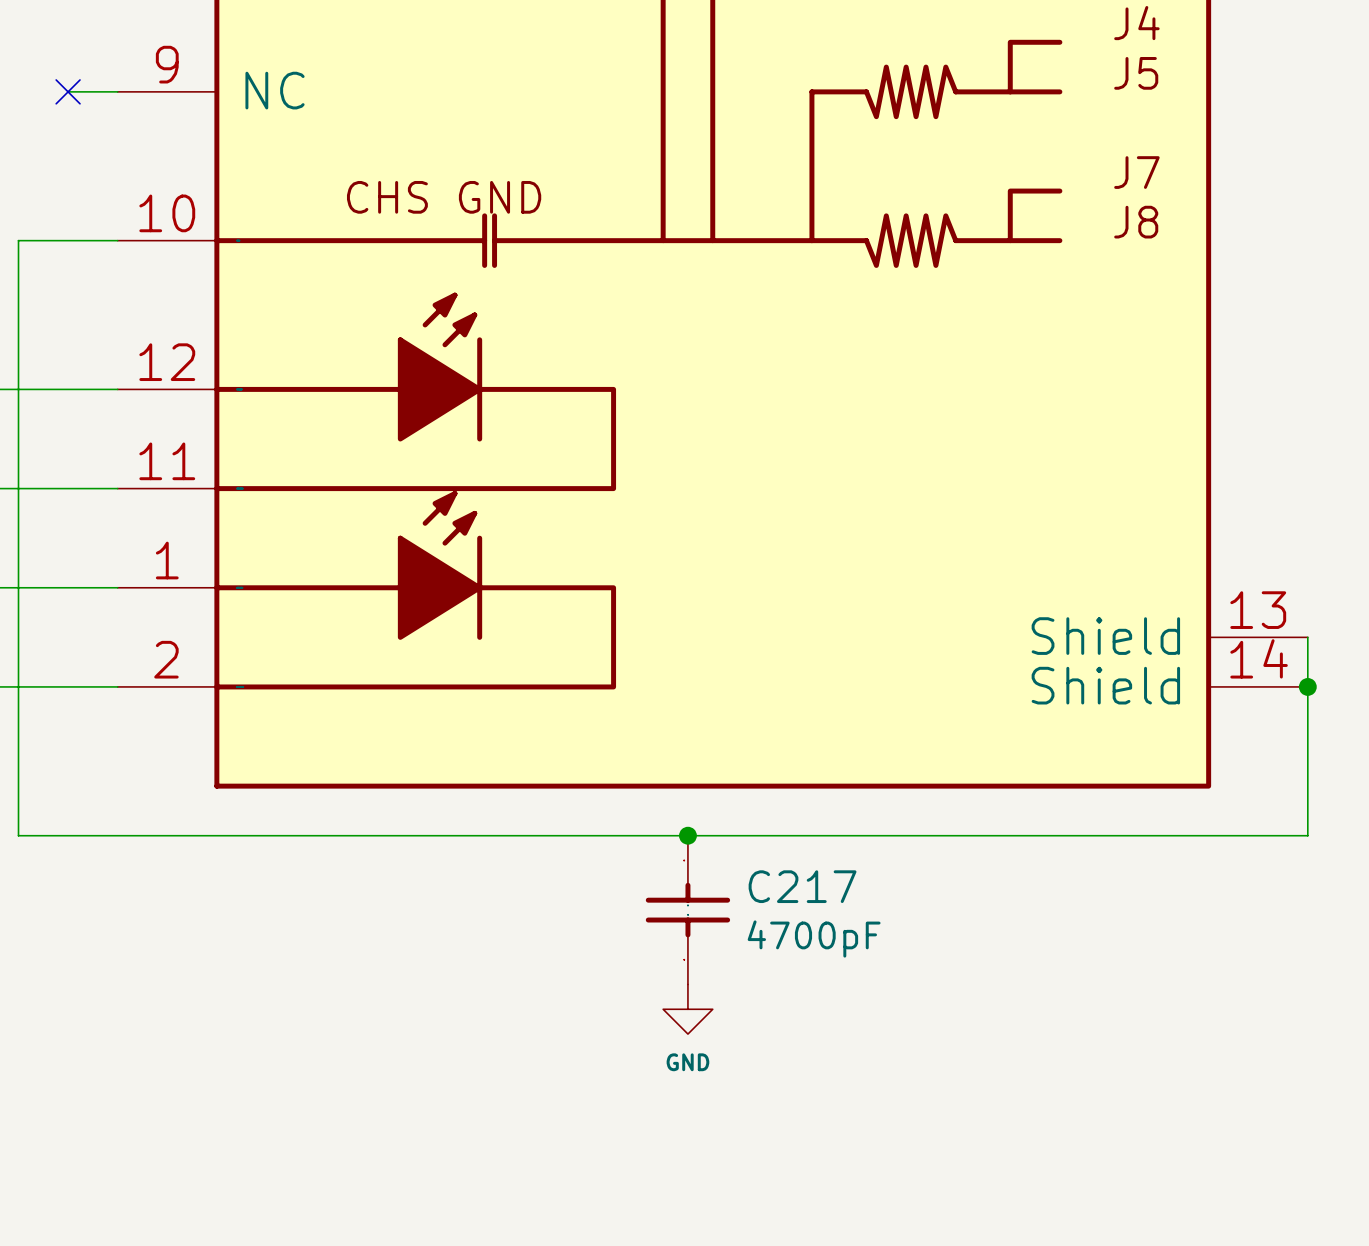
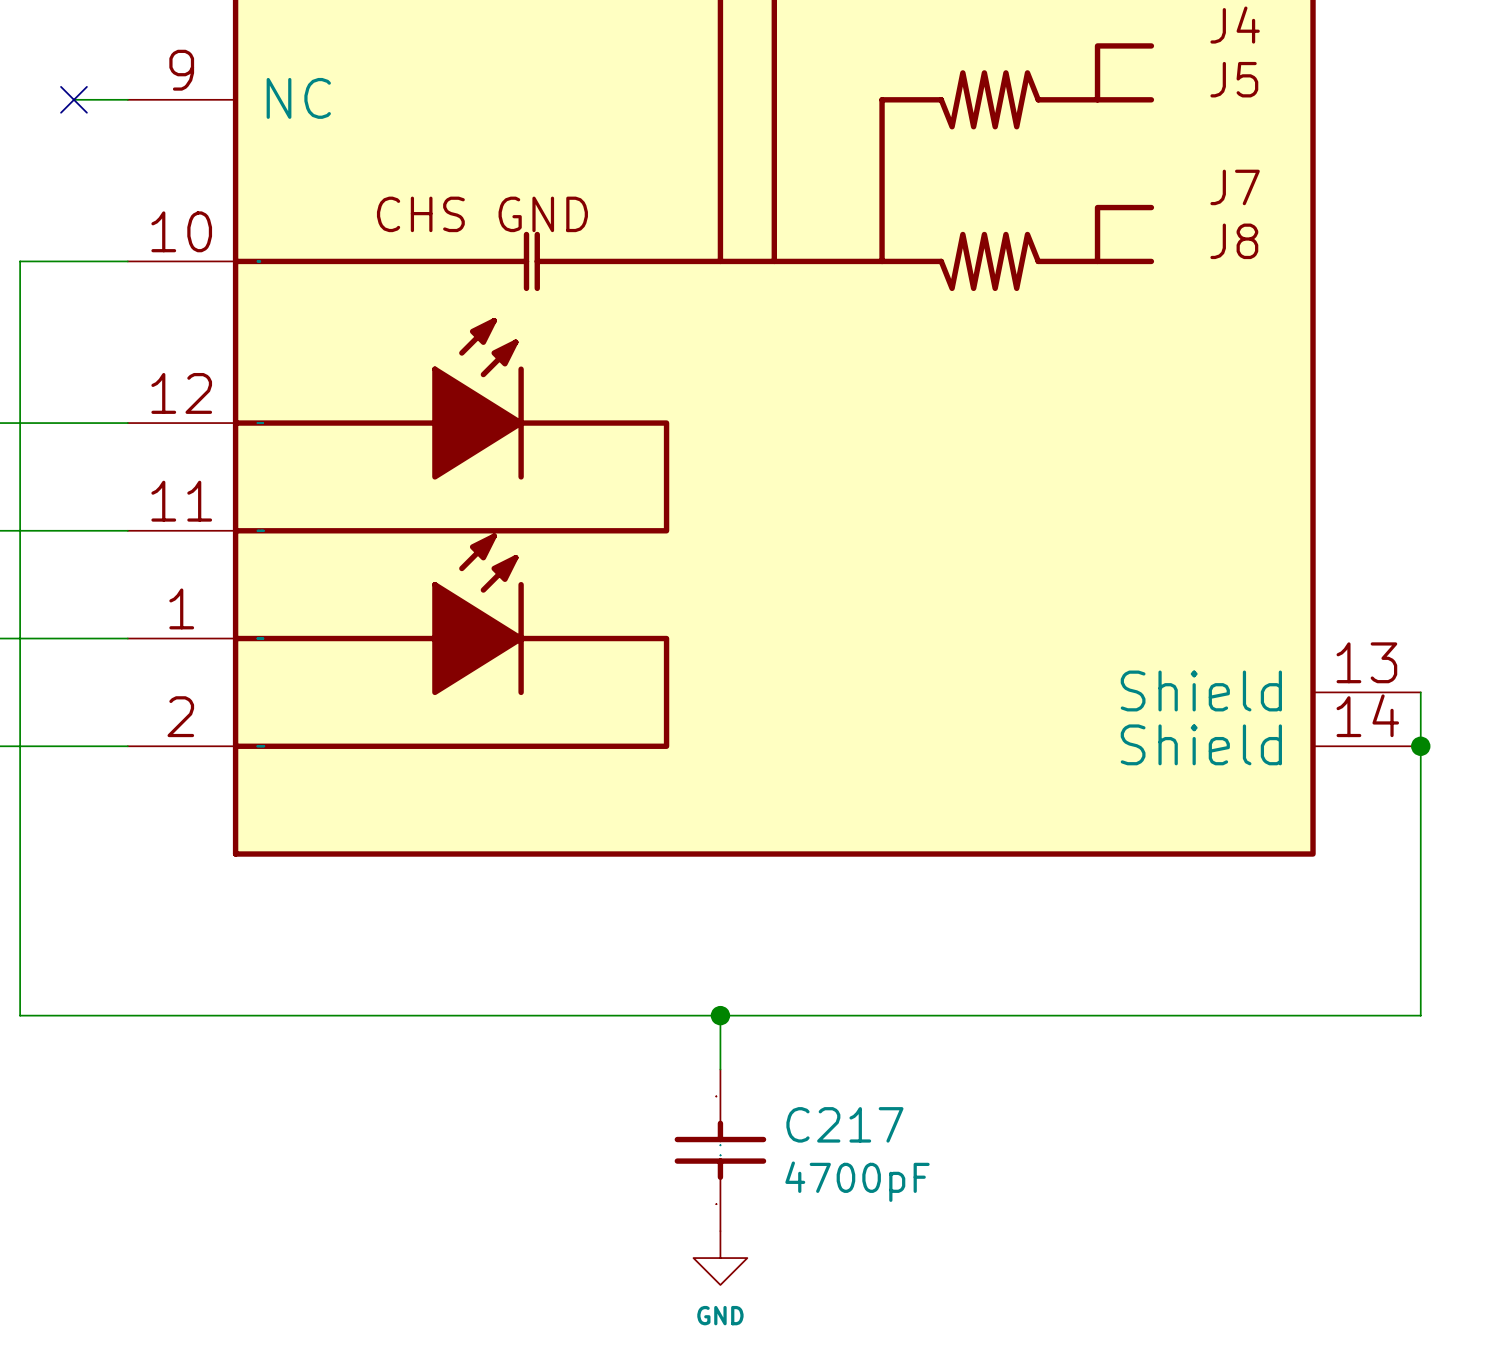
wire: (18, 835) (1307, 835) -> (20, 907) (20, 1015) (1420, 1015) (1420, 907)
junction position: (687, 835) -> (720, 1015)
C217 position: (687, 910) -> (720, 1150)
wire: none -> (720, 1015) (720, 1069)
power symbol position: GND (687, 1009) -> GND (720, 1258)

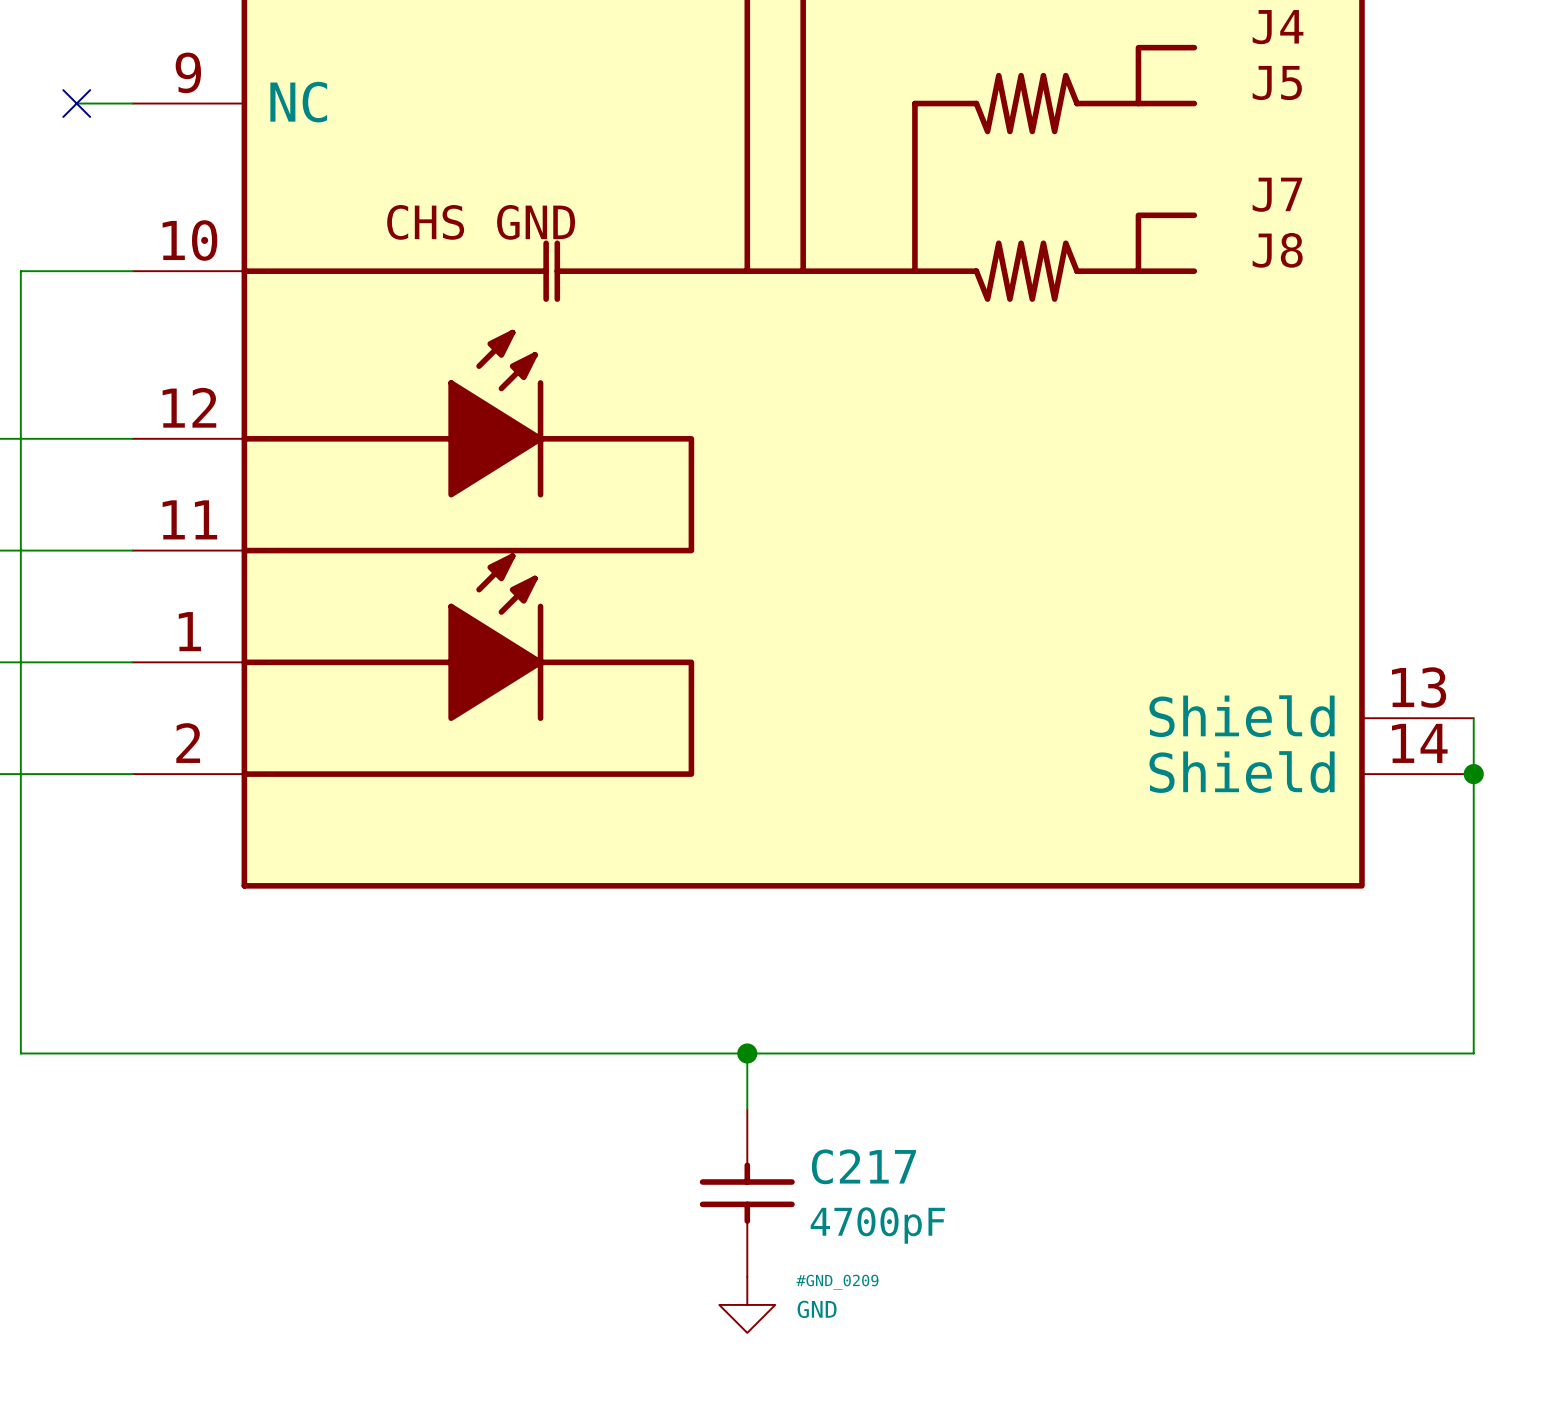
#GND_0209 name: none -> #GND_0209 (837, 1282)
#GND_0209 text position: GND (720, 1315) -> GND (817, 1309)

